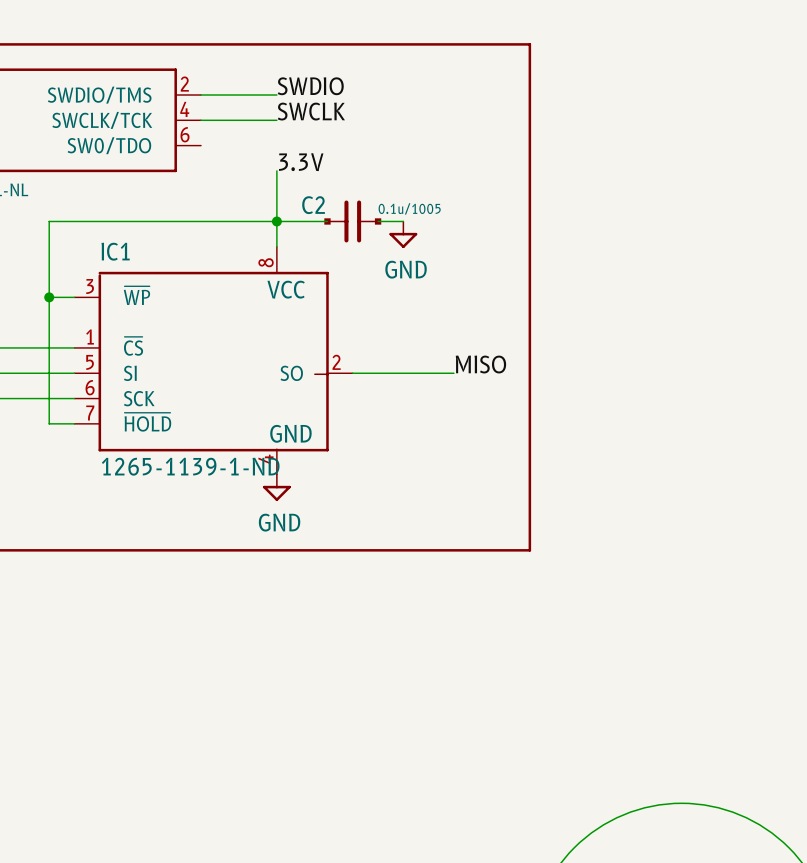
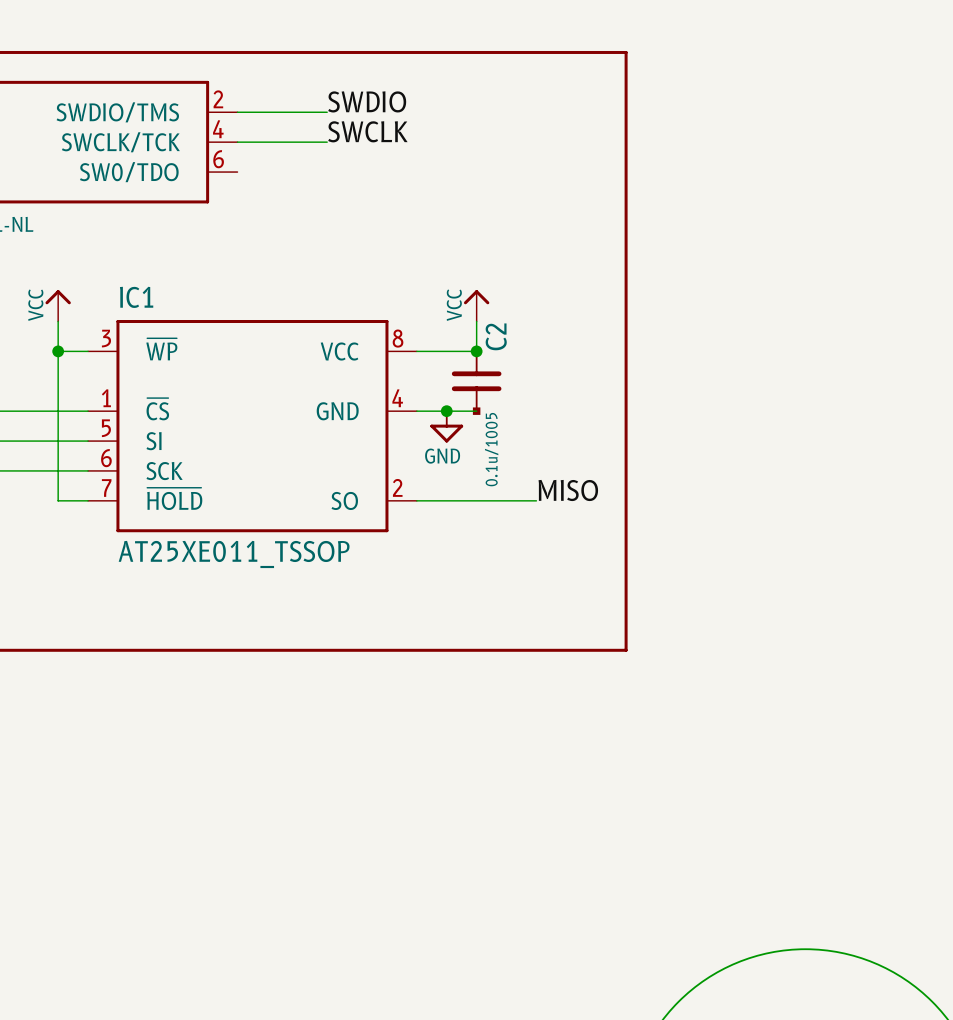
label: 3.3V (301, 162) -> none
wire: (276, 170) (276, 246) -> none
junction: (276, 221) -> none
wire: (327, 221) (49, 221) (49, 272) -> none
C2 rotation: 0° (352, 221) -> 90° clockwise (476, 381)
C2 position: (352, 221) -> (476, 381)
wire: (378, 221) (403, 221) -> none
power symbol: GND (403, 234) -> none
IC1 symbol: [74, 246, 353, 475] -> [88, 320, 417, 533]
power symbol: none -> VCC (58, 305)
power symbol: none -> VCC (476, 305)
wire: none -> (476, 321) (476, 351) (416, 351)
junction: none -> (476, 351)
wire: none -> (416, 411) (476, 411)
junction: none -> (446, 411)
power symbol: none -> GND (446, 426)
label position: MISO (480, 364) -> MISO (568, 490)
wire: (352, 373) (453, 373) -> (416, 500) (536, 500)
IC1 value: 1265-1139-1-ND (190, 466) -> AT25XE011_TSSOP (234, 554)
power symbol: GND (276, 487) -> none

